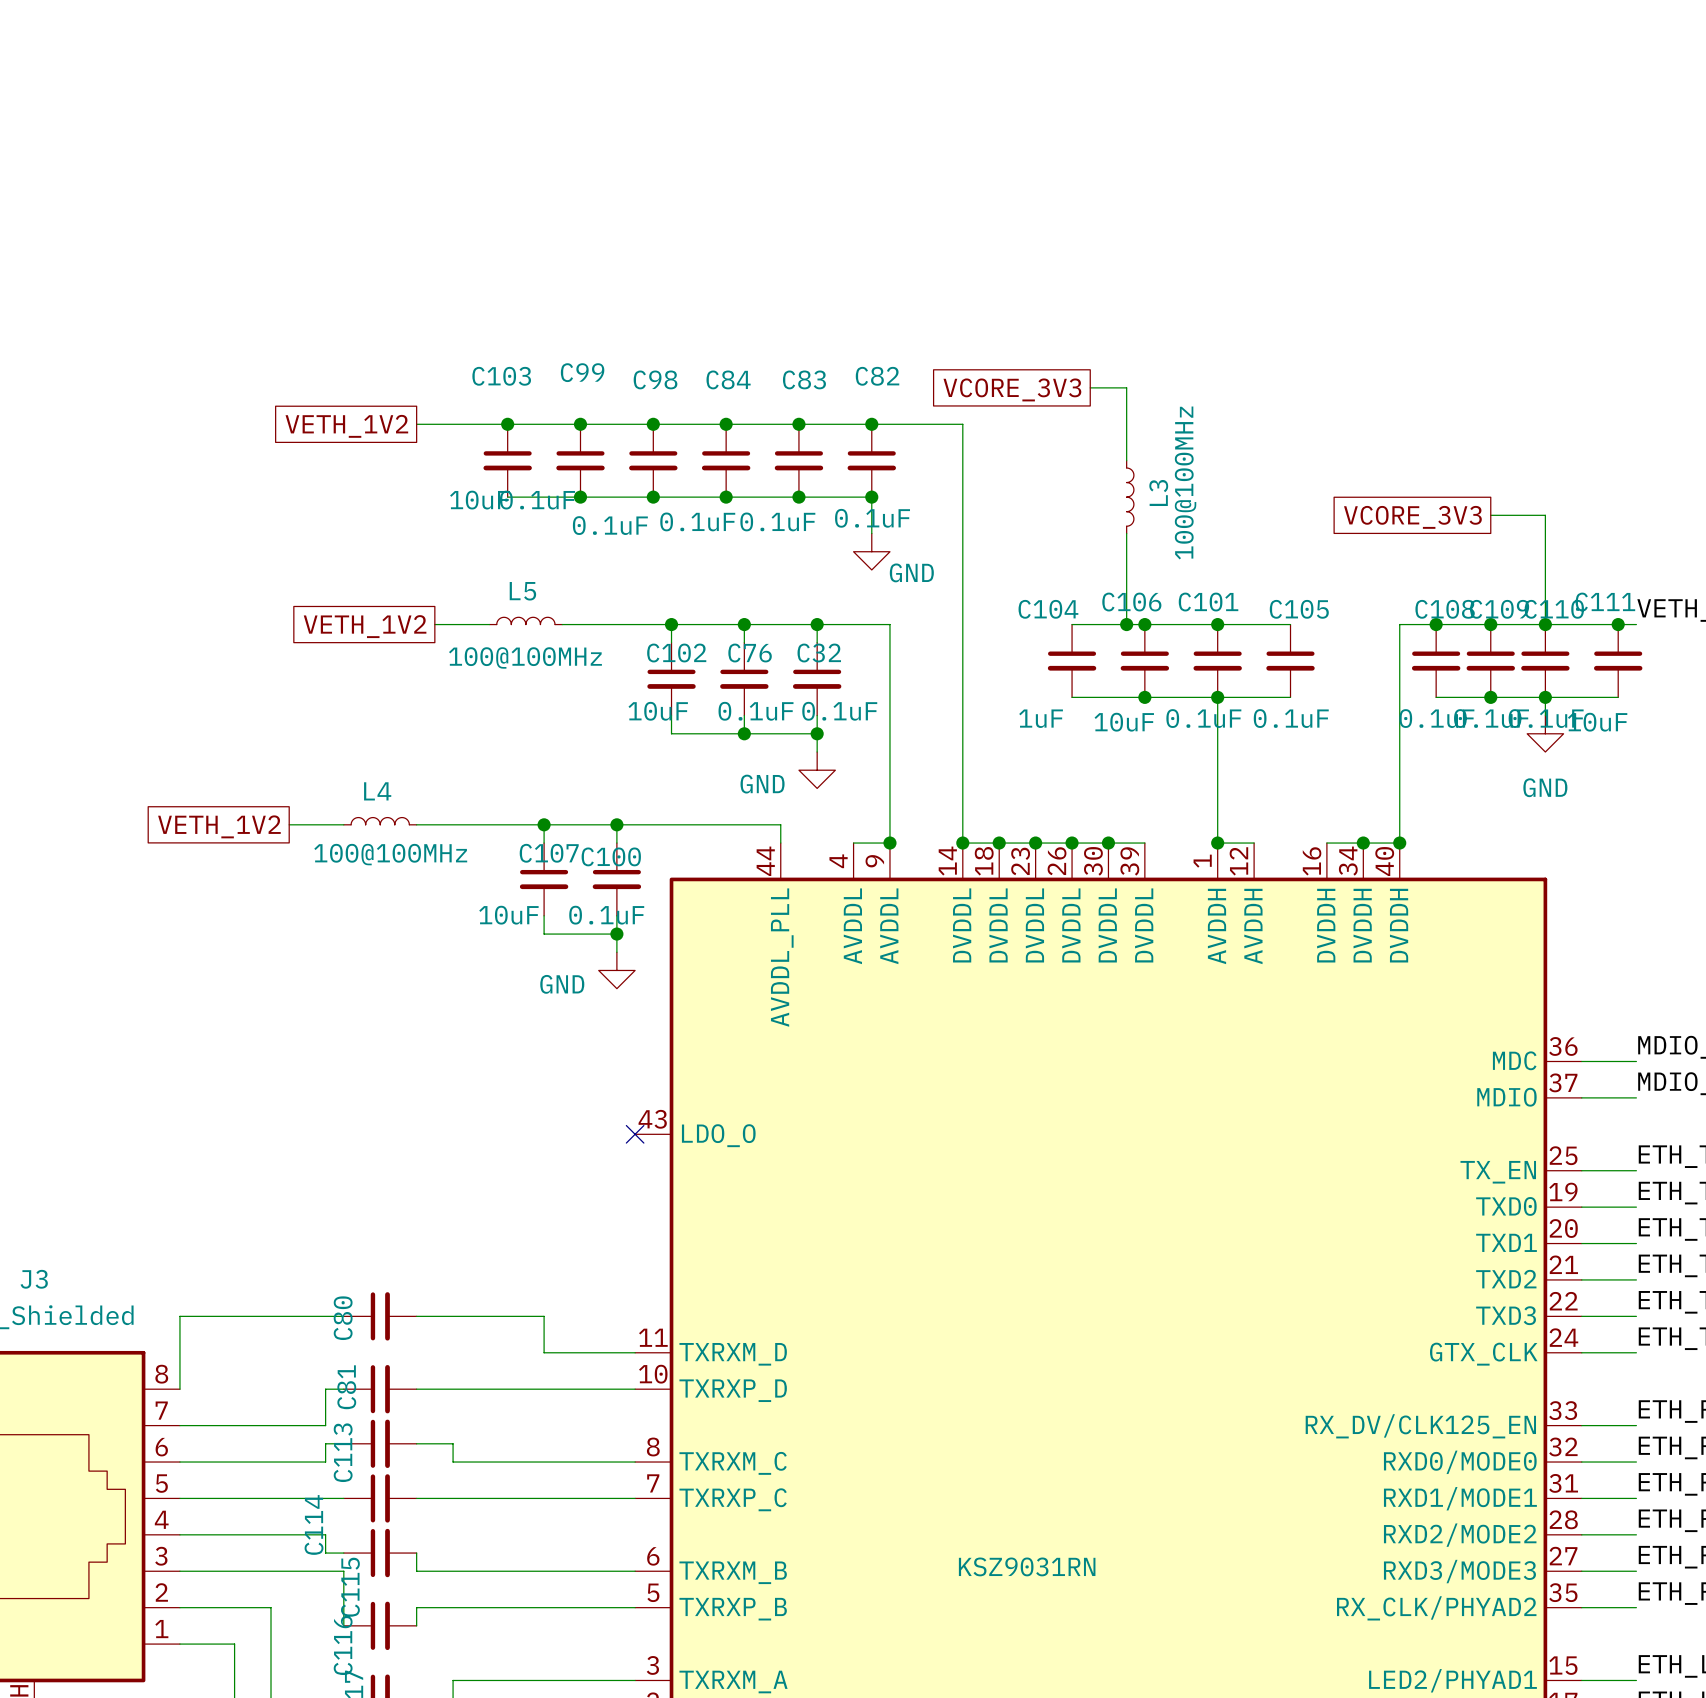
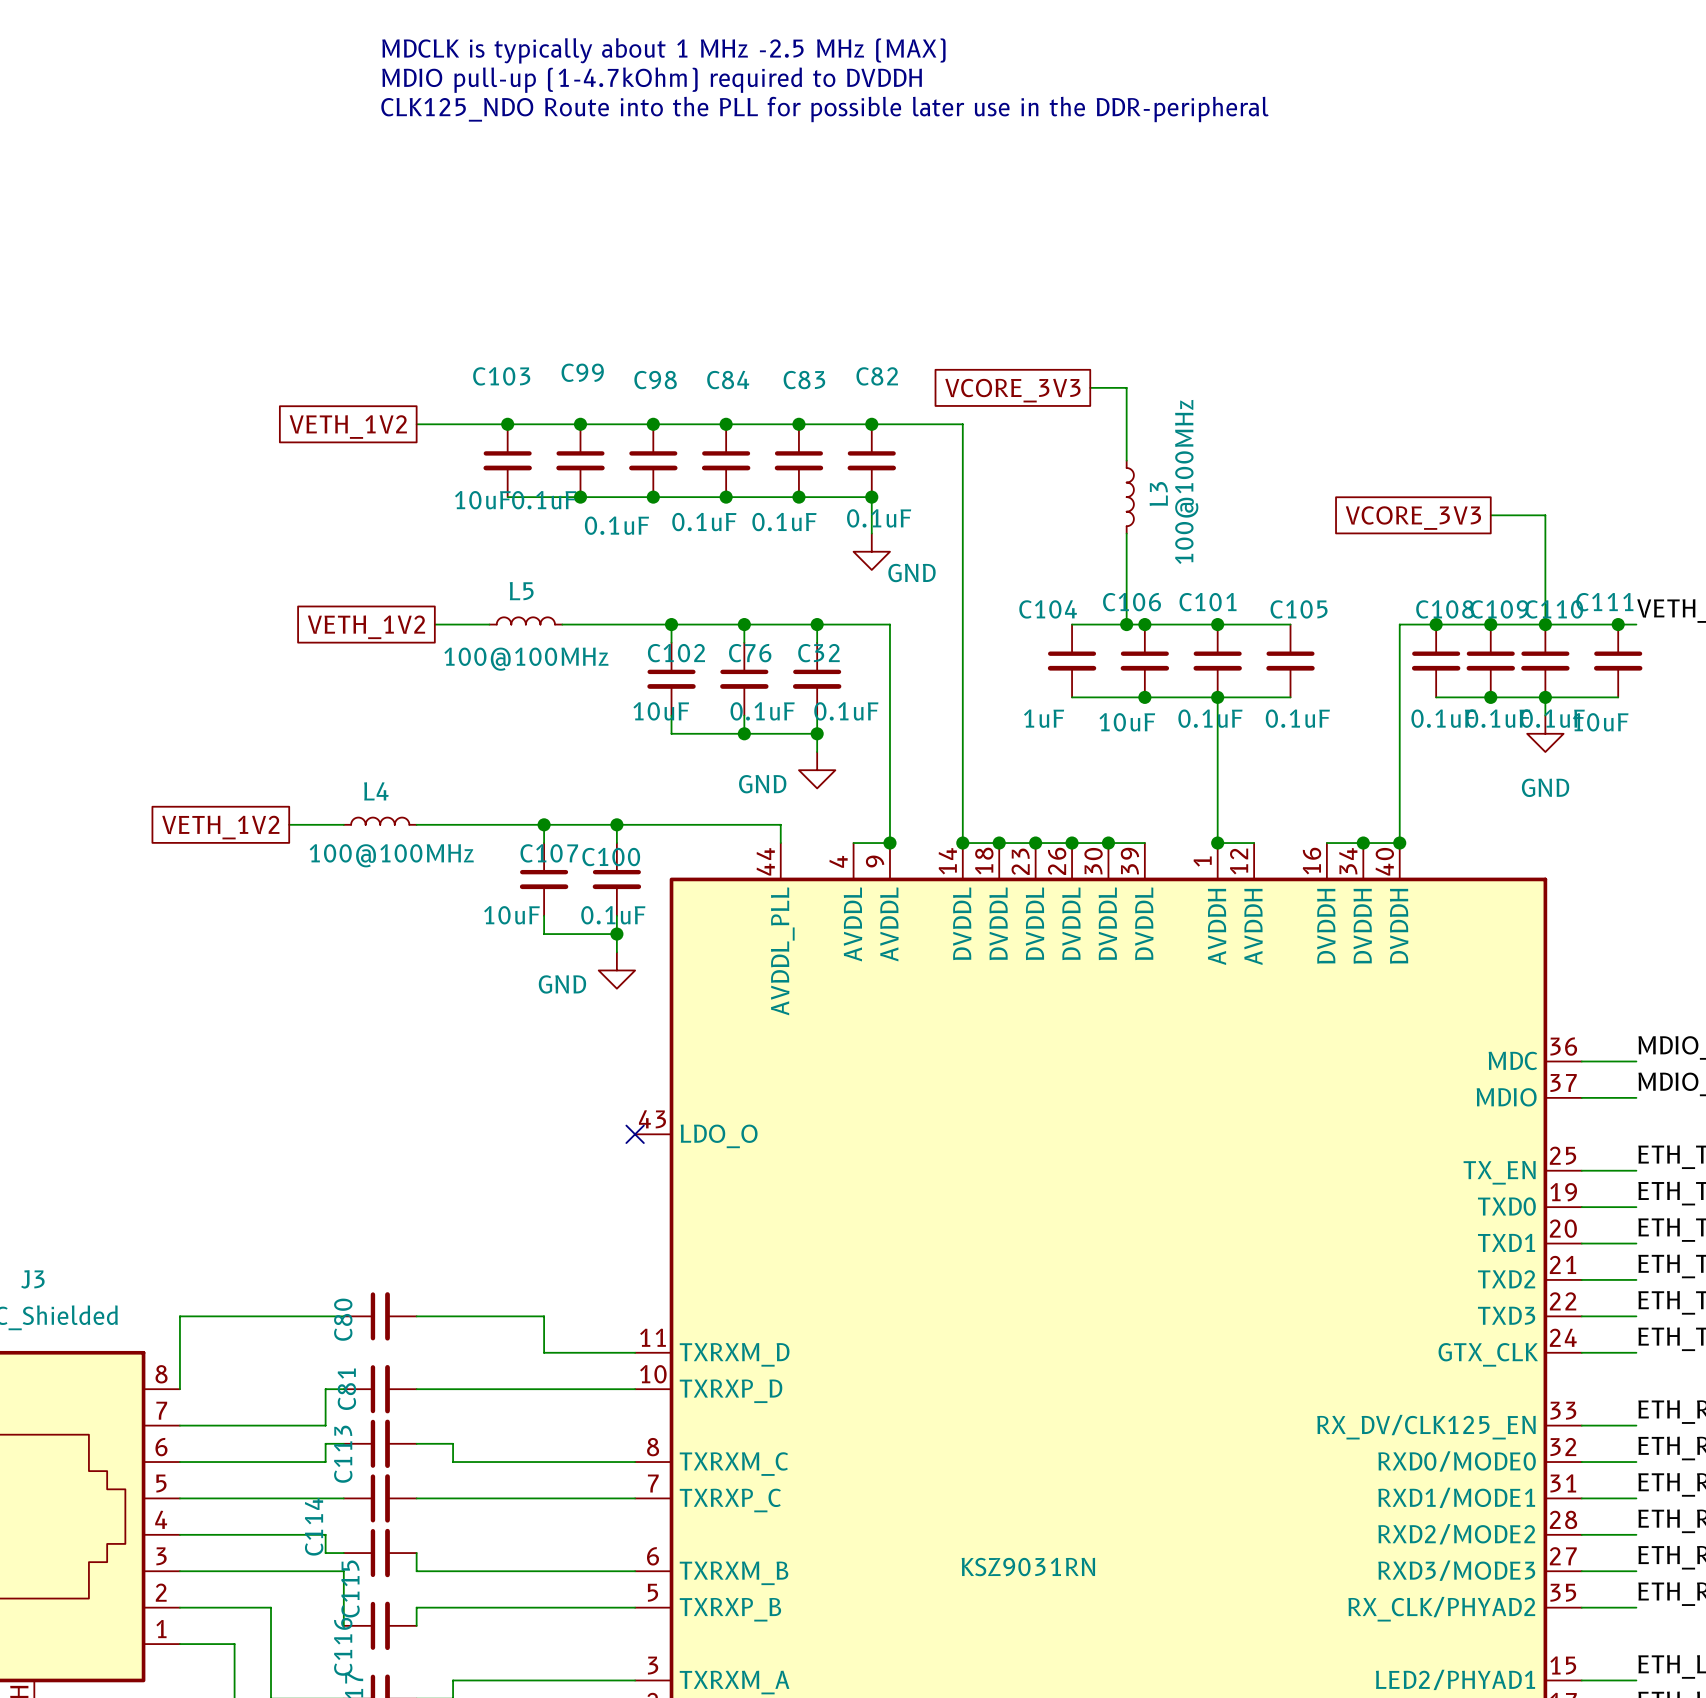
text: none -> MDCLK is typically about 1 MHz -2.5 MHz (MAX) (663, 50)
text: none -> MDIO pull-up (1-4.7kOhm) required to DVDDH (652, 80)
text: none -> CLK125_NDO Route into the PLL for possible later use in the DDR-peripheral (824, 109)

